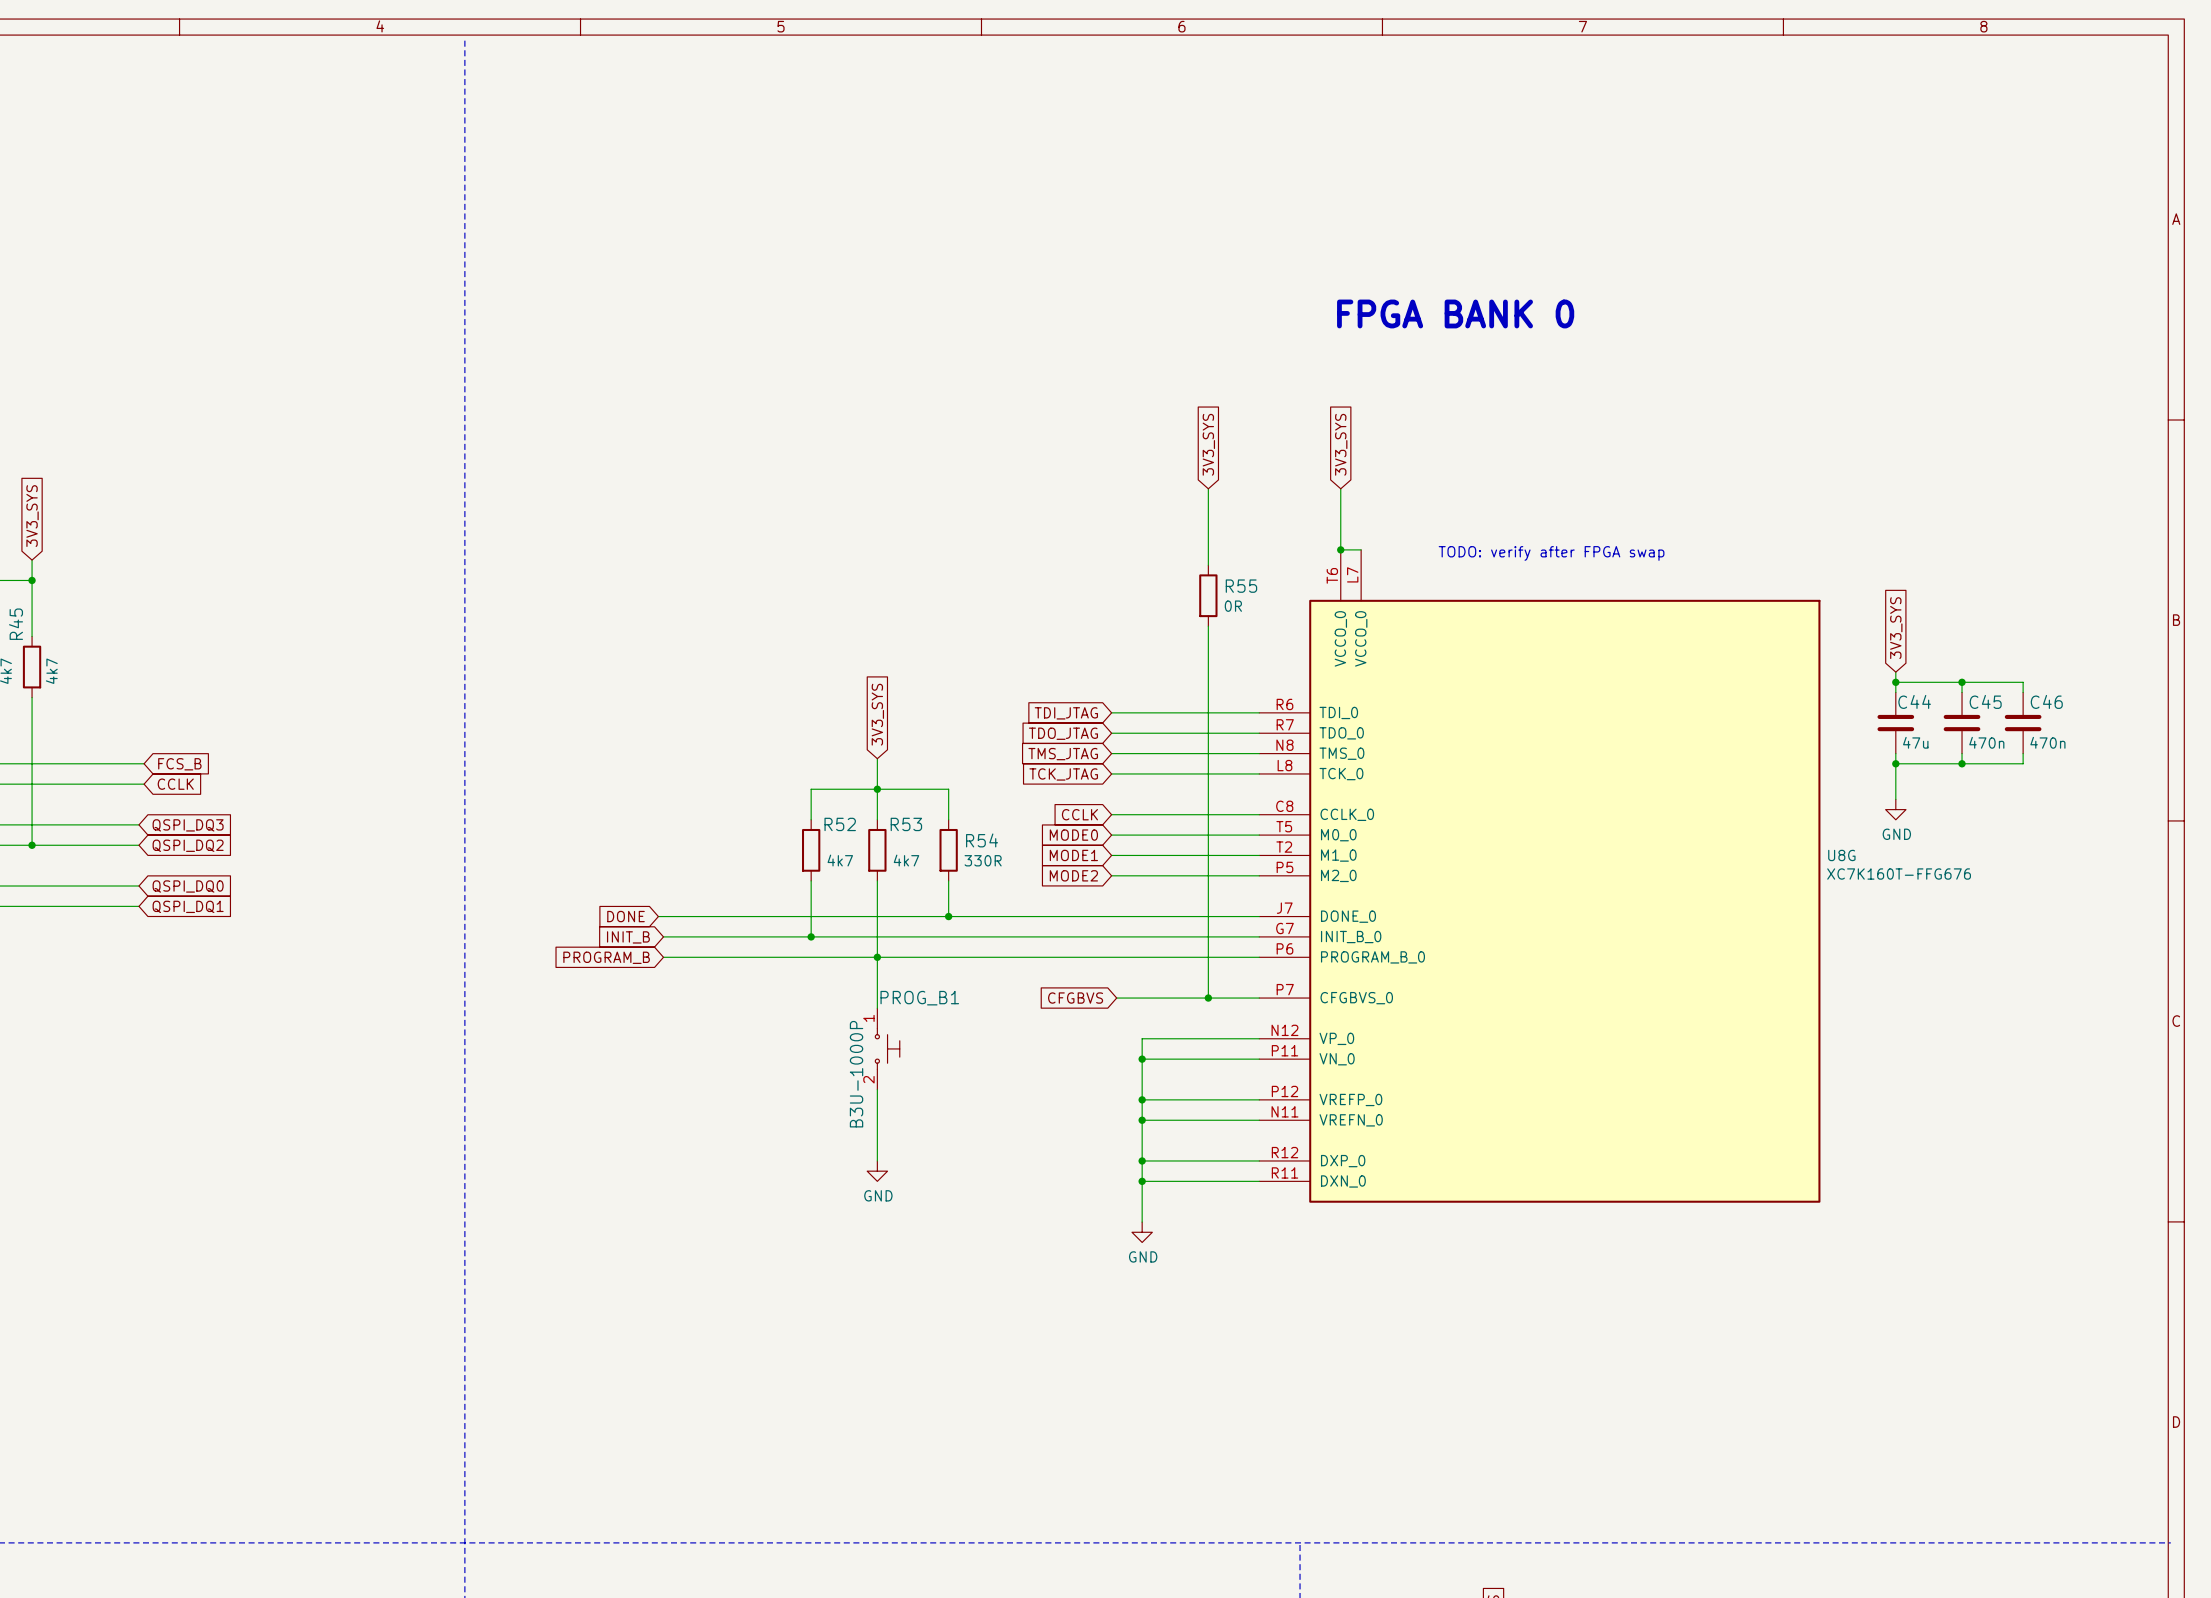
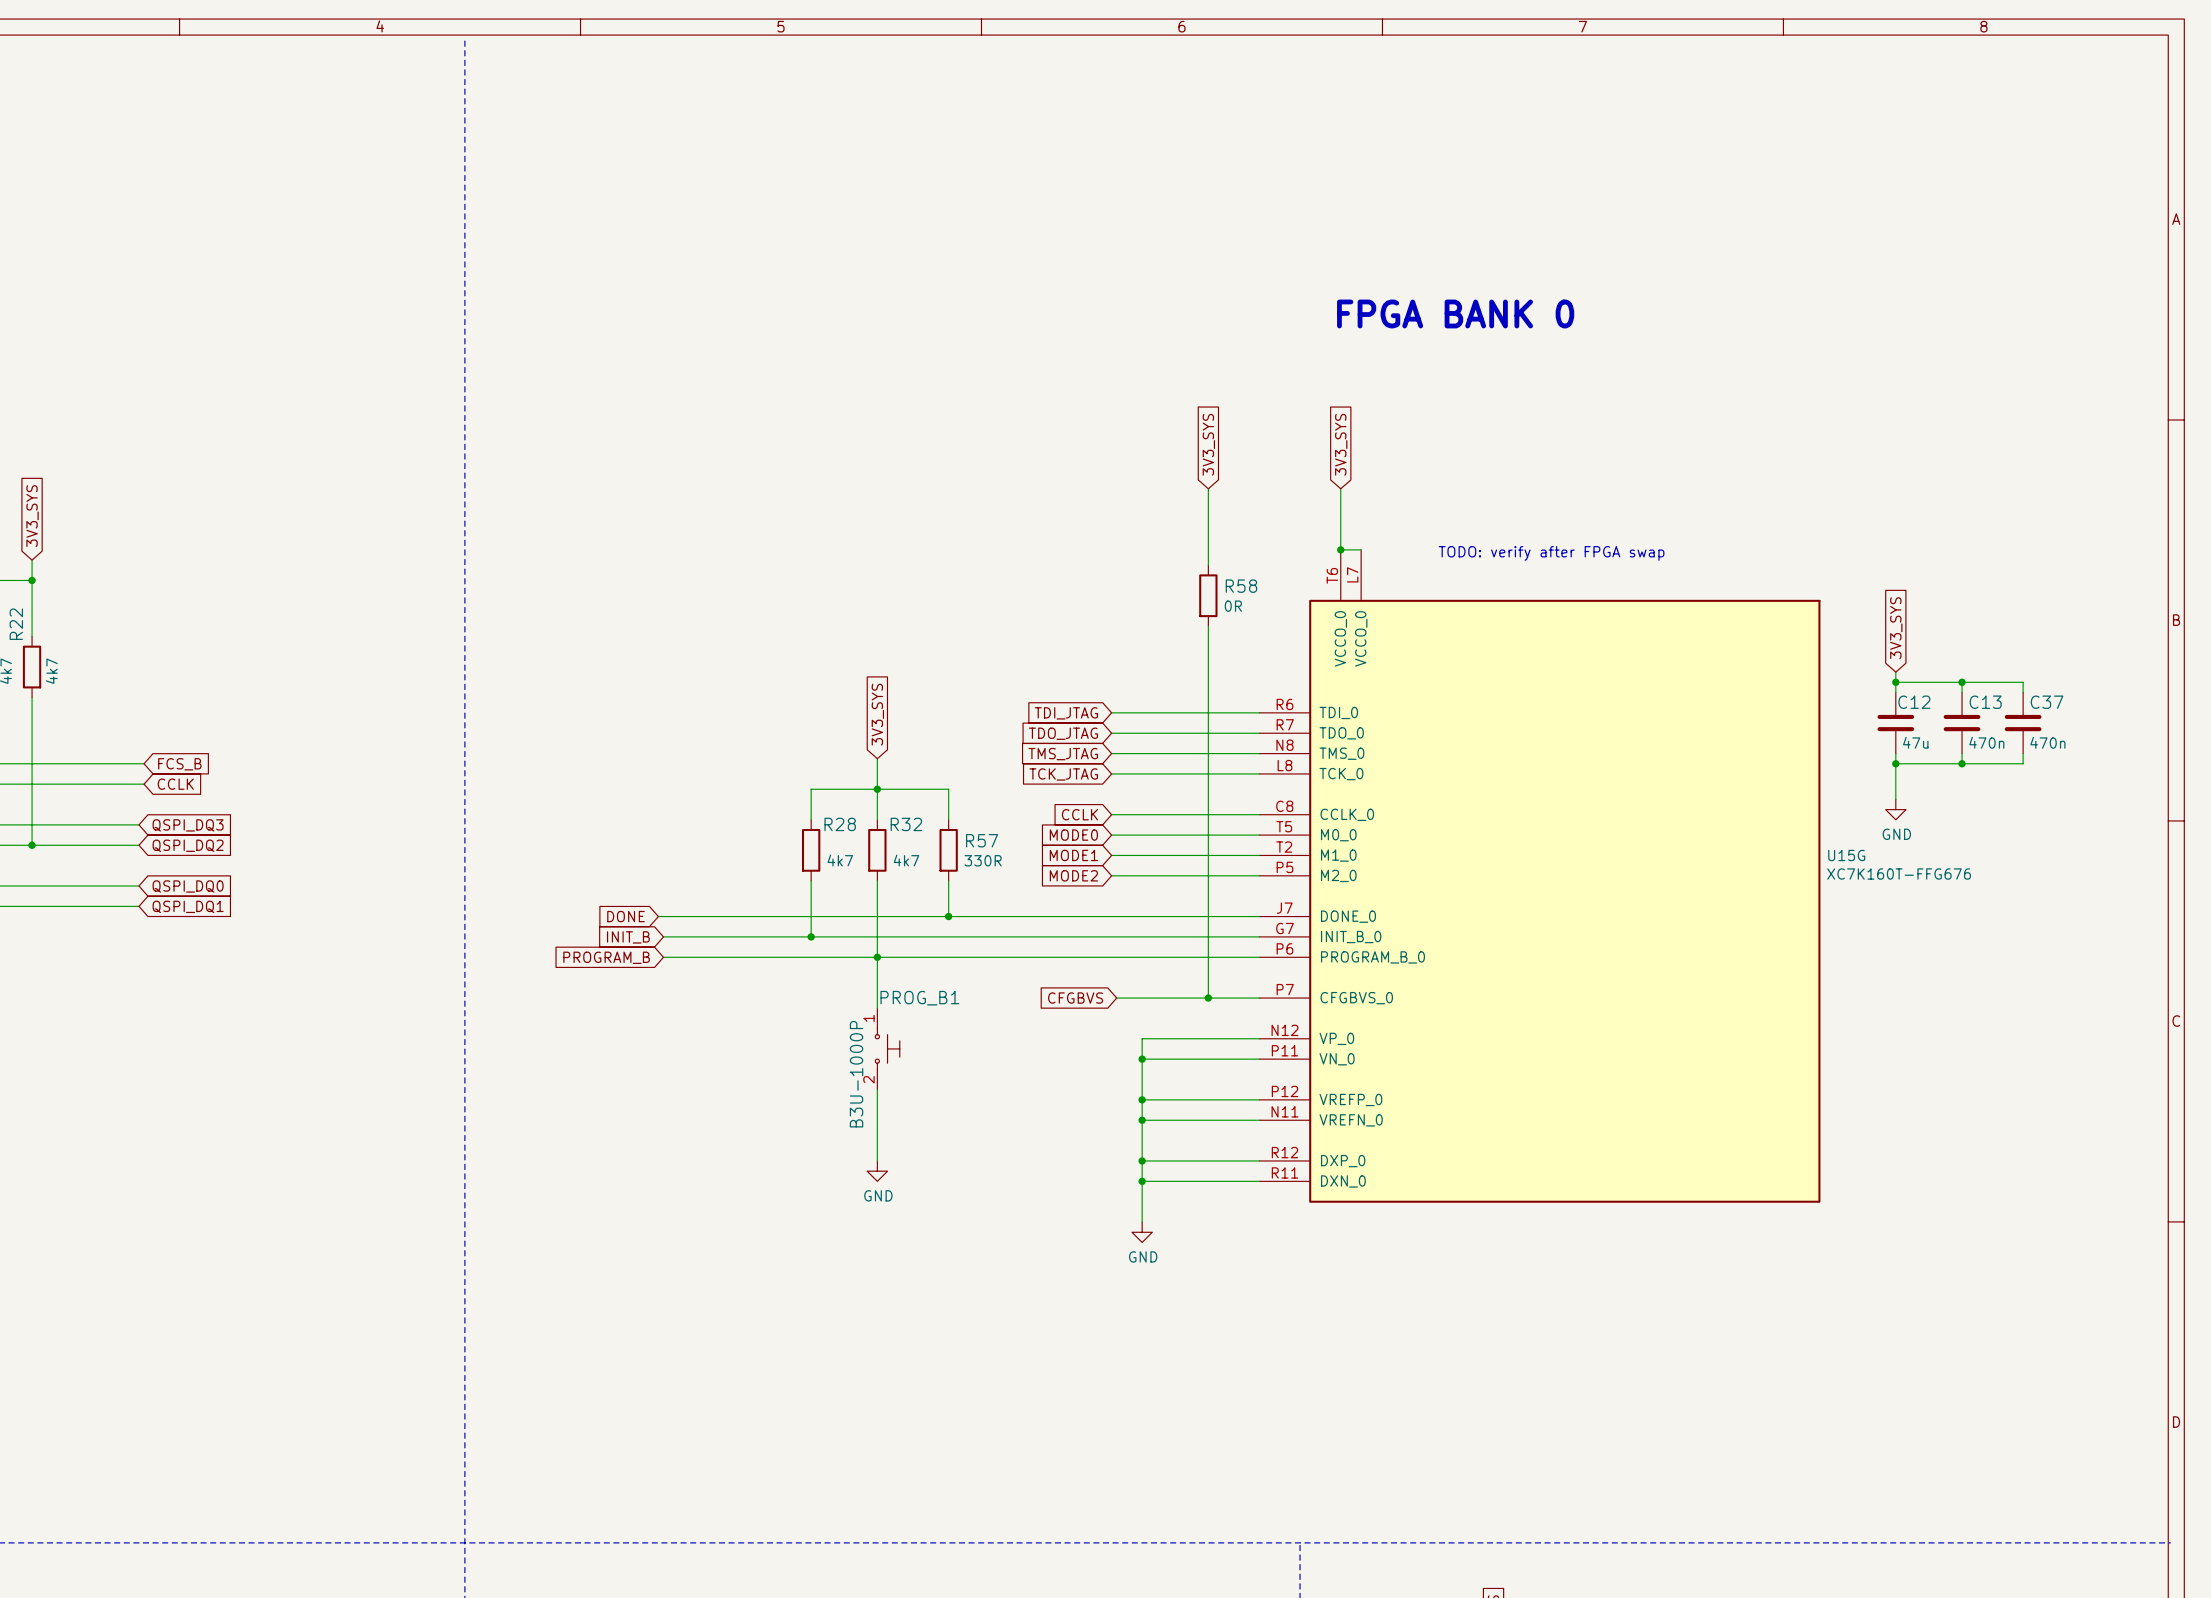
R55 name: R55 (1241, 586) -> R58 (1241, 586)
R45 name: R45 (16, 624) -> R22 (16, 624)
C44 name: C44 (1914, 701) -> C12 (1914, 702)
C45 name: C45 (1985, 701) -> C13 (1985, 702)
C46 name: C46 (2046, 701) -> C37 (2047, 702)
R52 name: R52 (840, 824) -> R28 (840, 824)
R53 name: R53 (906, 824) -> R32 (906, 824)
R54 name: R54 (982, 840) -> R57 (982, 840)
U8G name: U8G (1841, 855) -> U15G (1846, 855)

